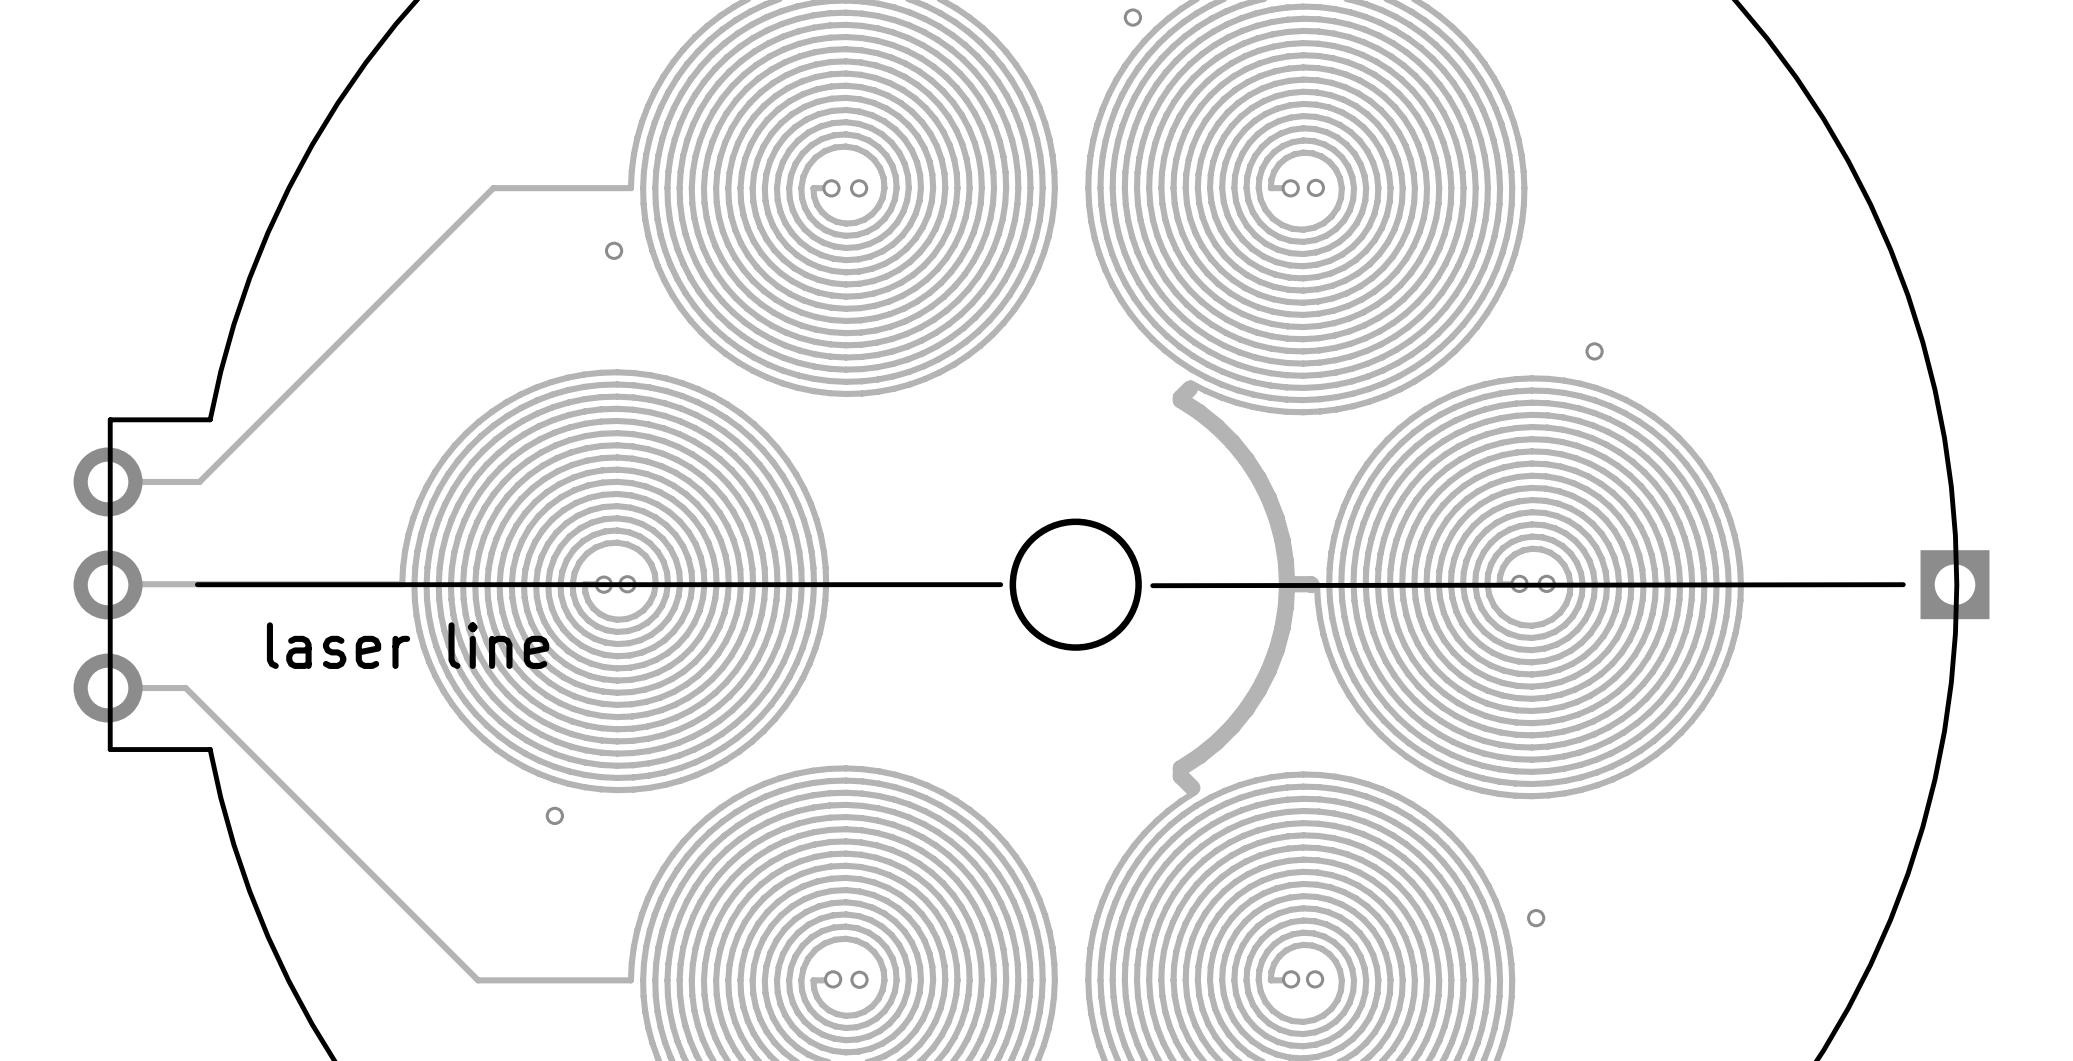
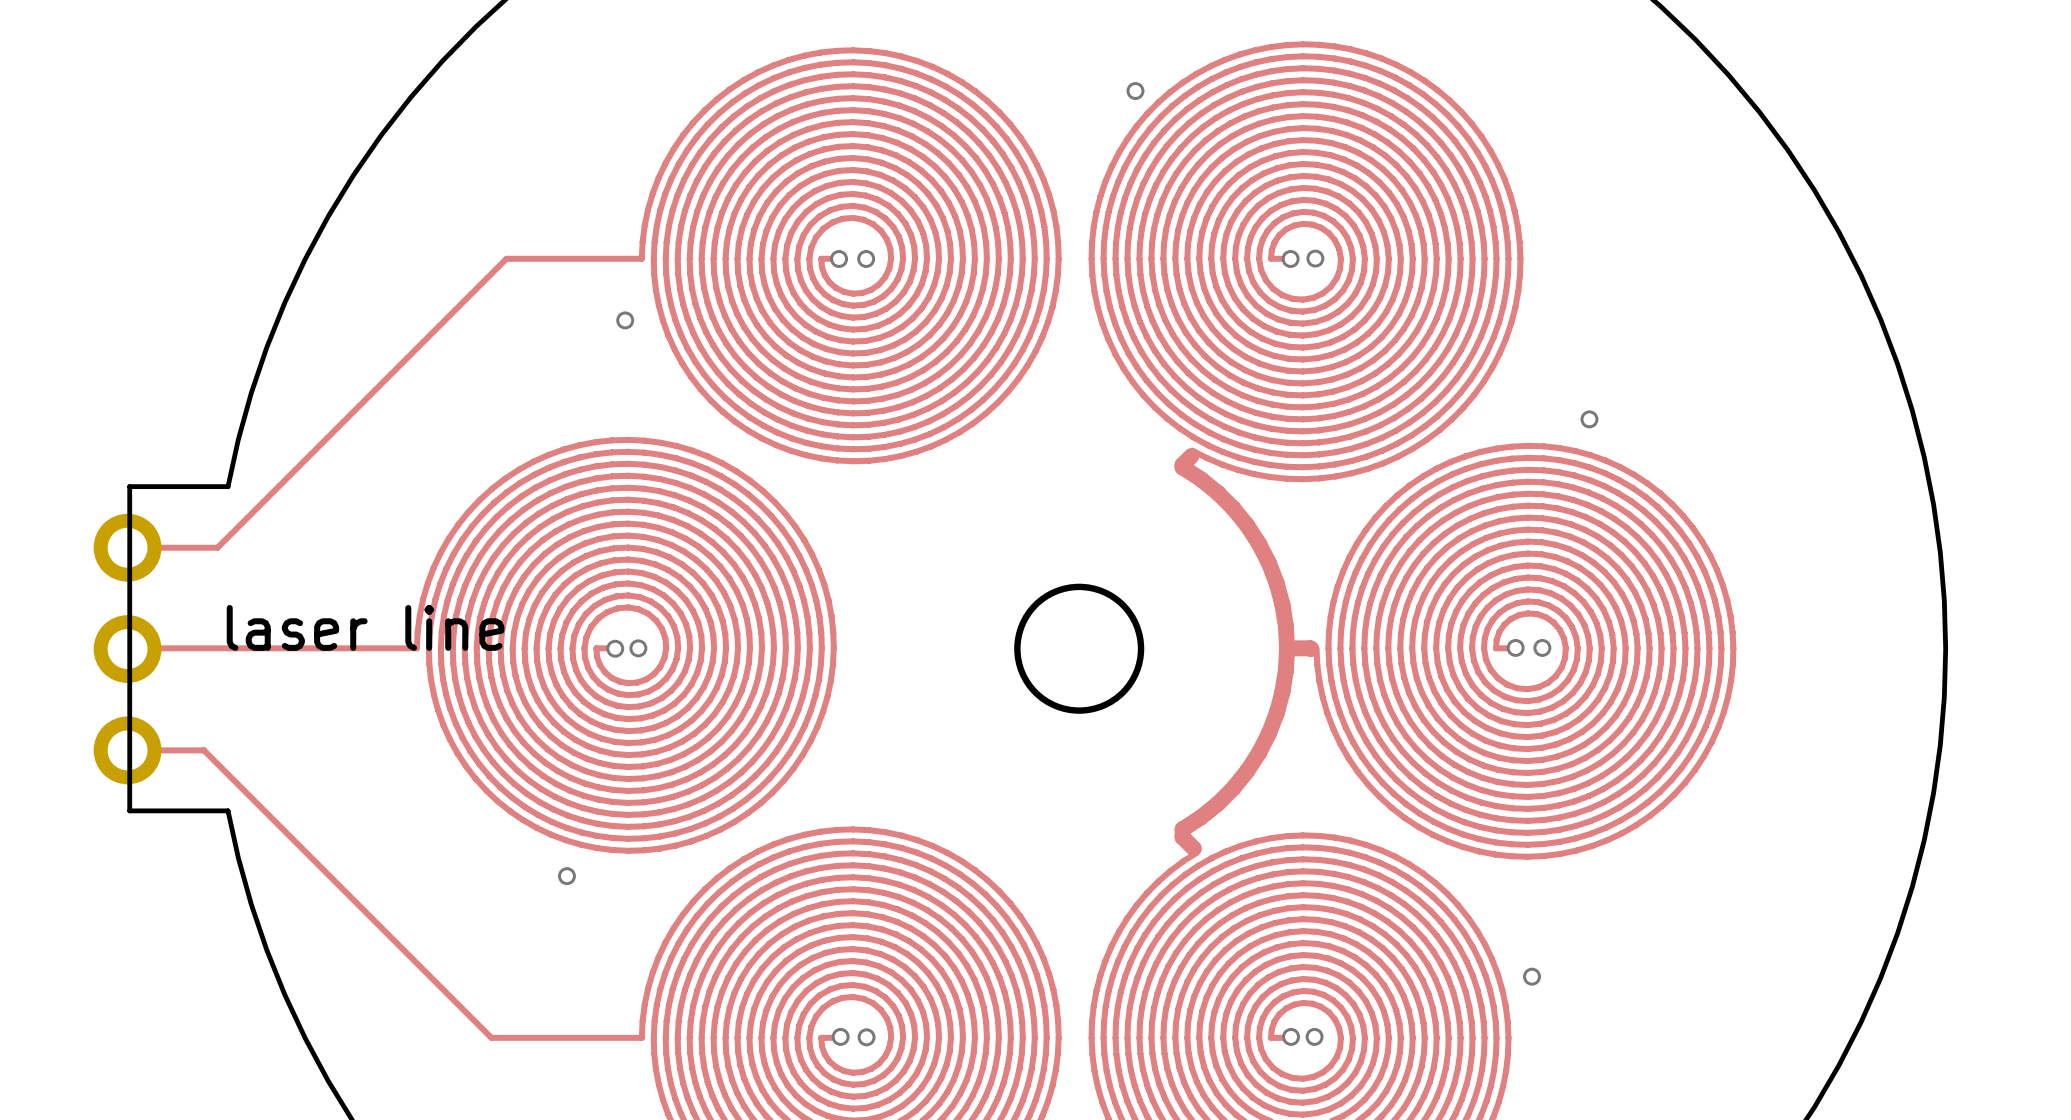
line: (197, 584) (1000, 584) -> none
line: (1903, 584) (1152, 585) -> none
part: (1955, 584) -> none
text position: laser line (408, 645) -> laser line (365, 627)

